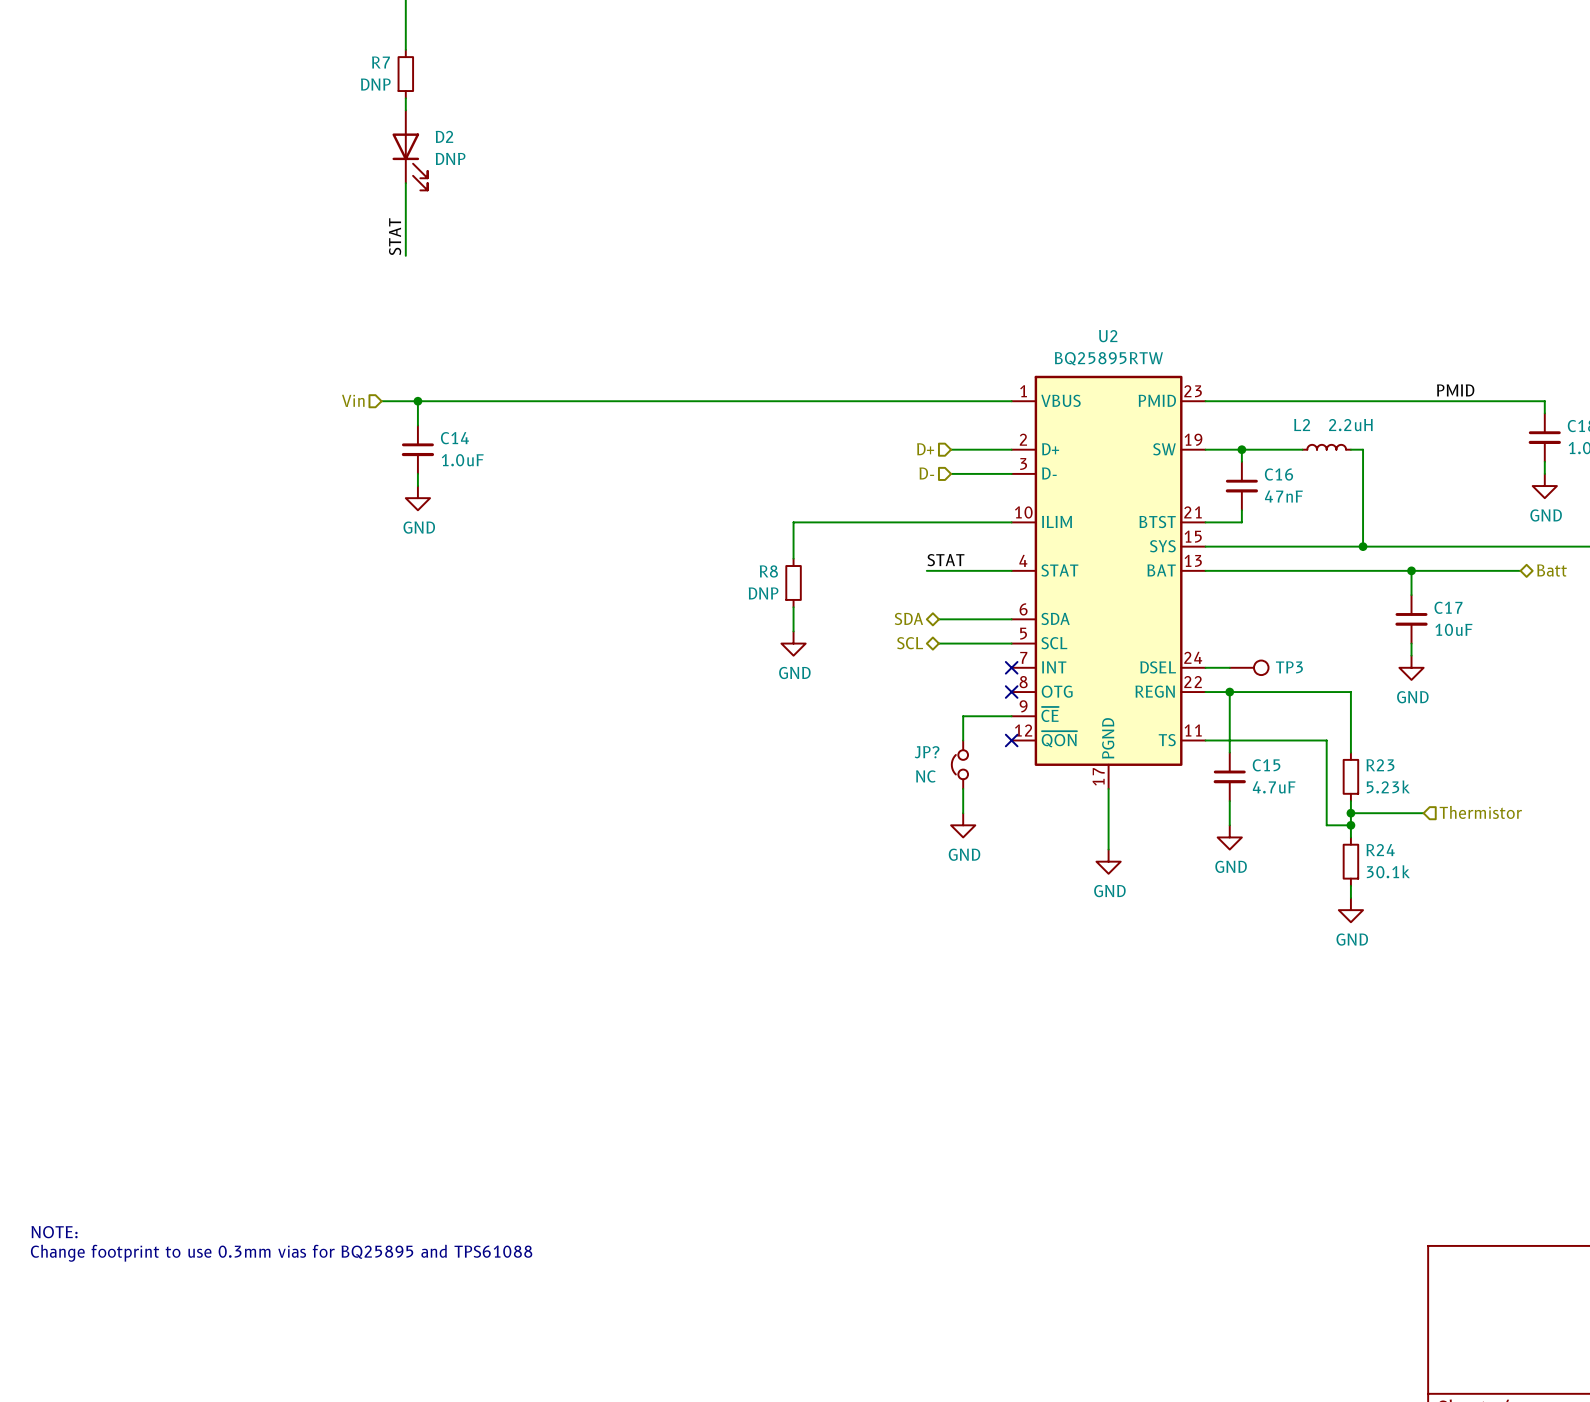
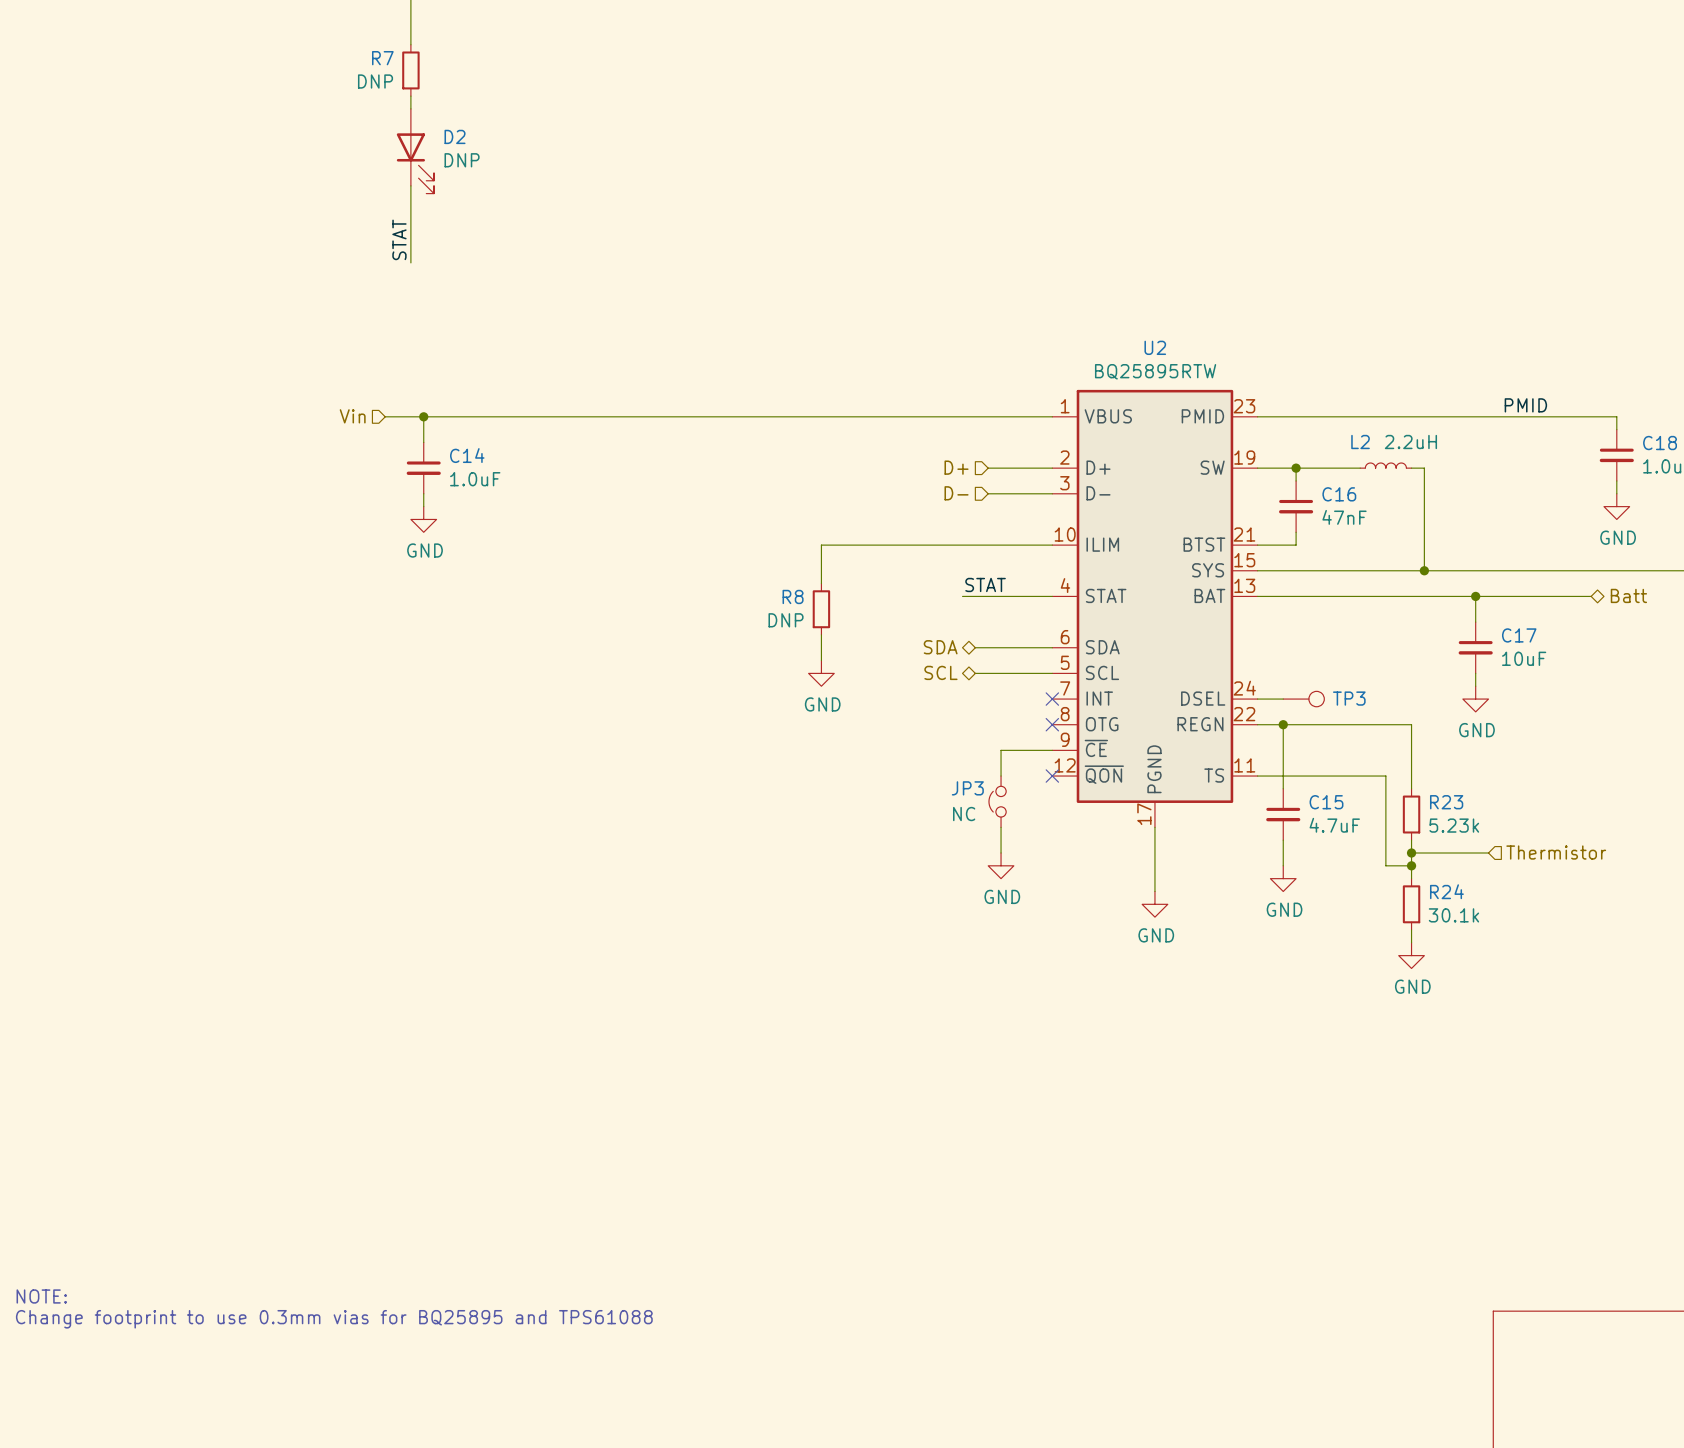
JP? name: JP? (927, 752) -> JP3 (967, 788)

